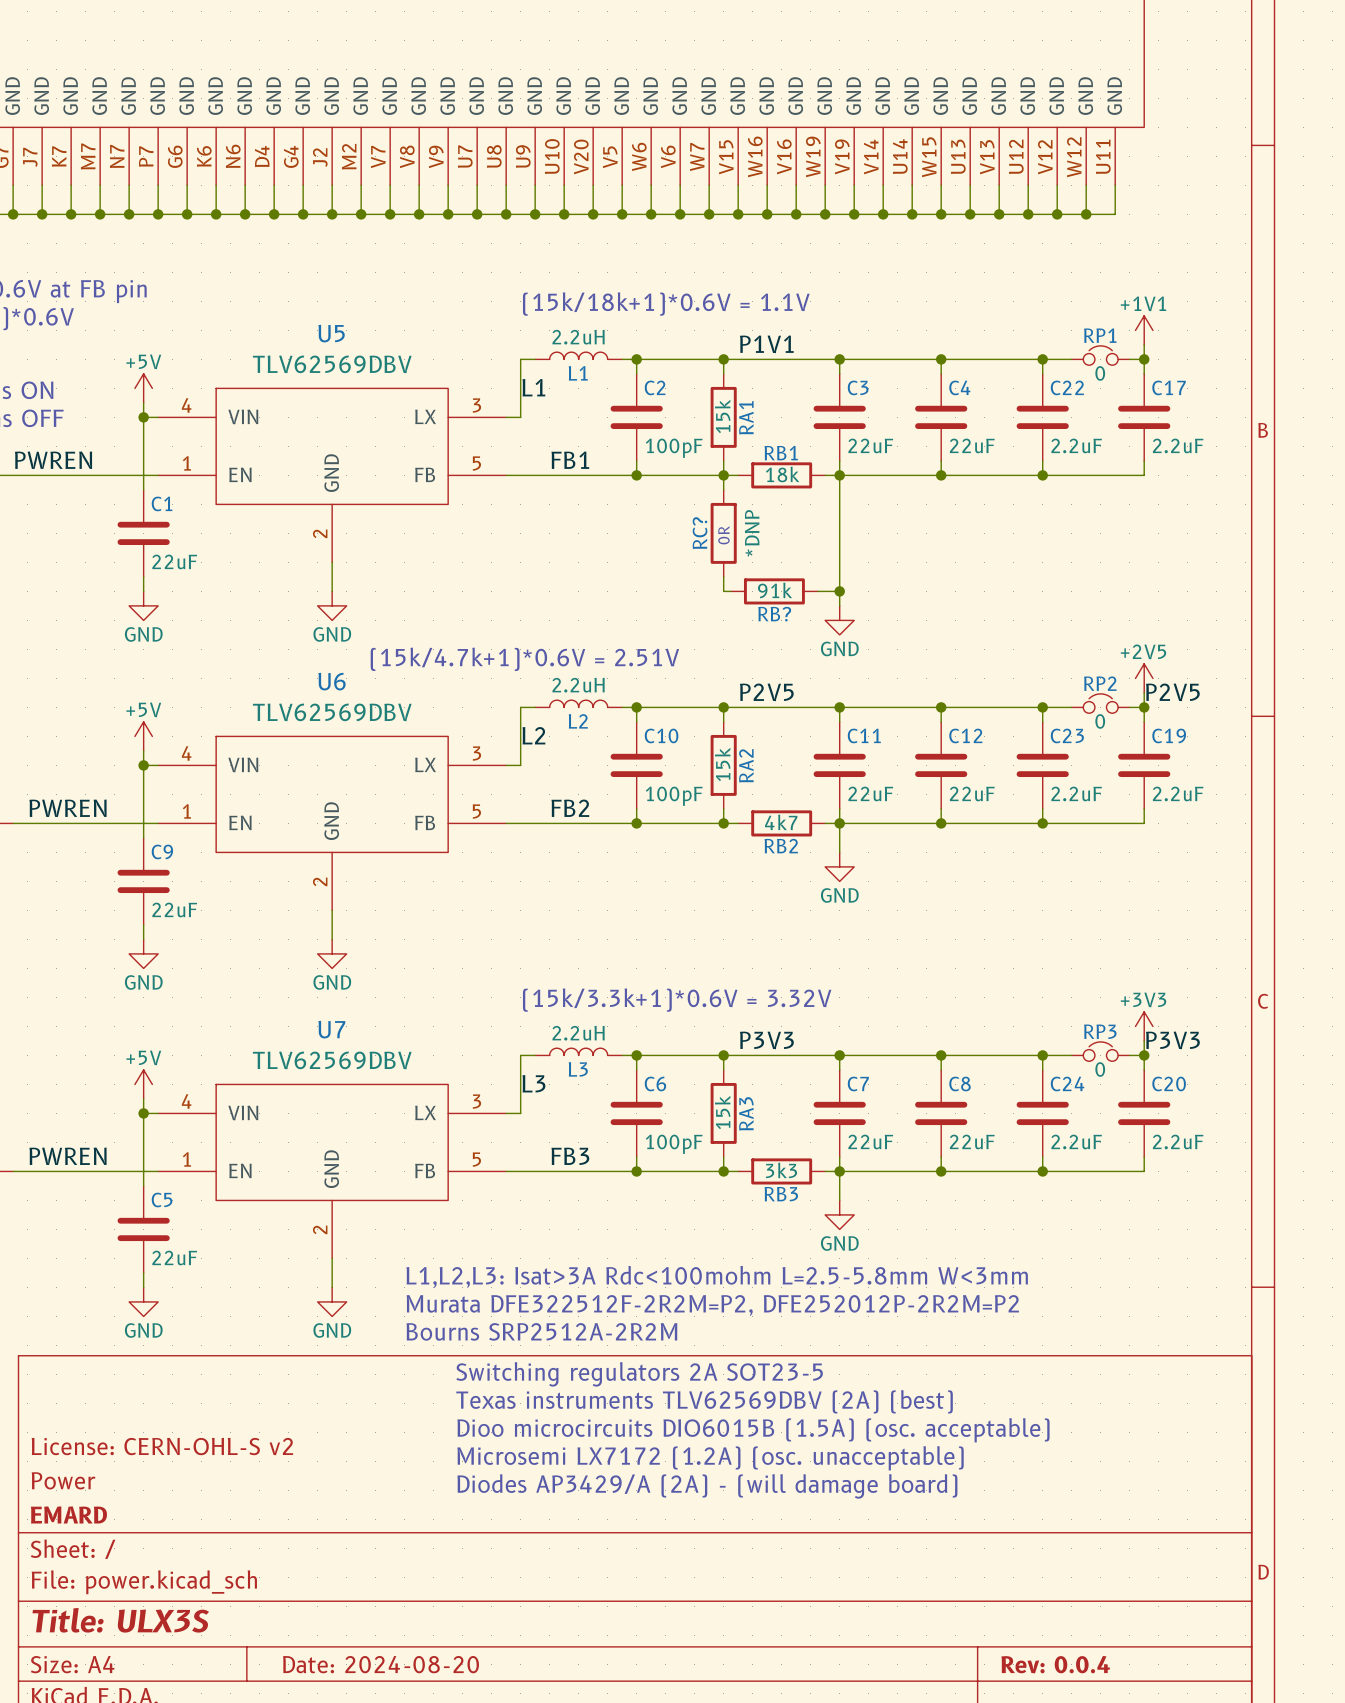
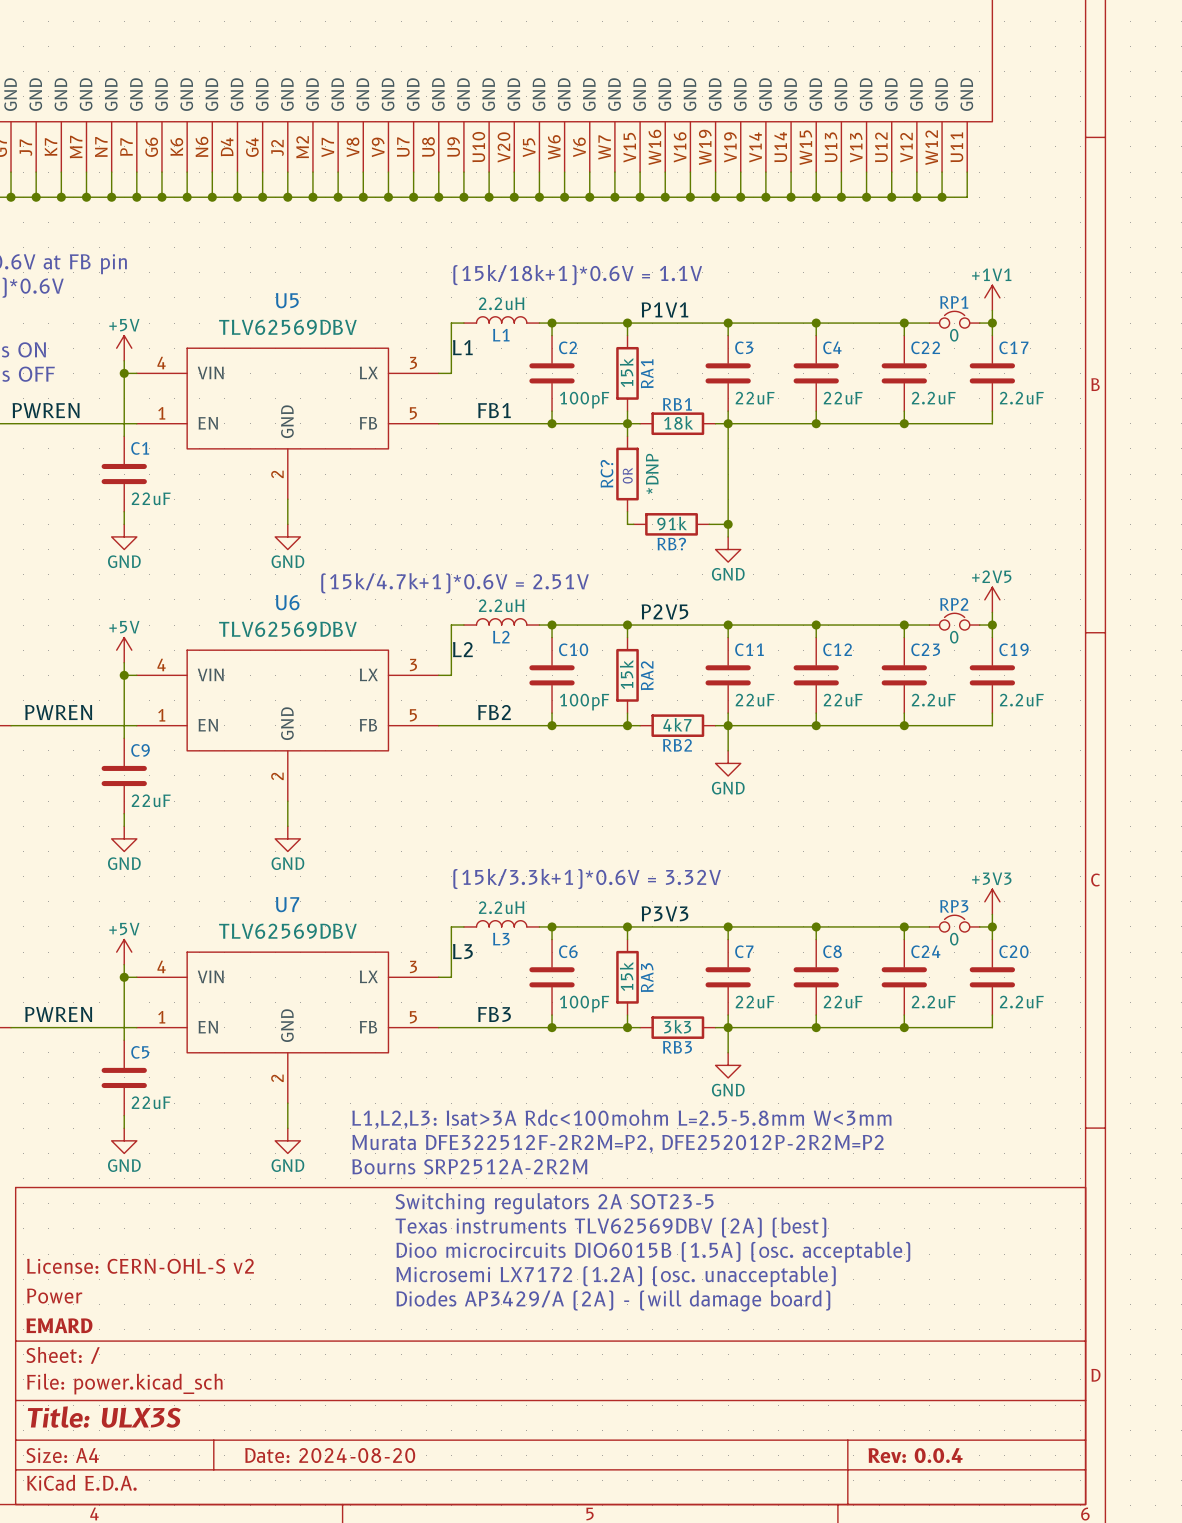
label: P2V5 (1172, 692) -> none
label: P3V3 (1172, 1040) -> none

